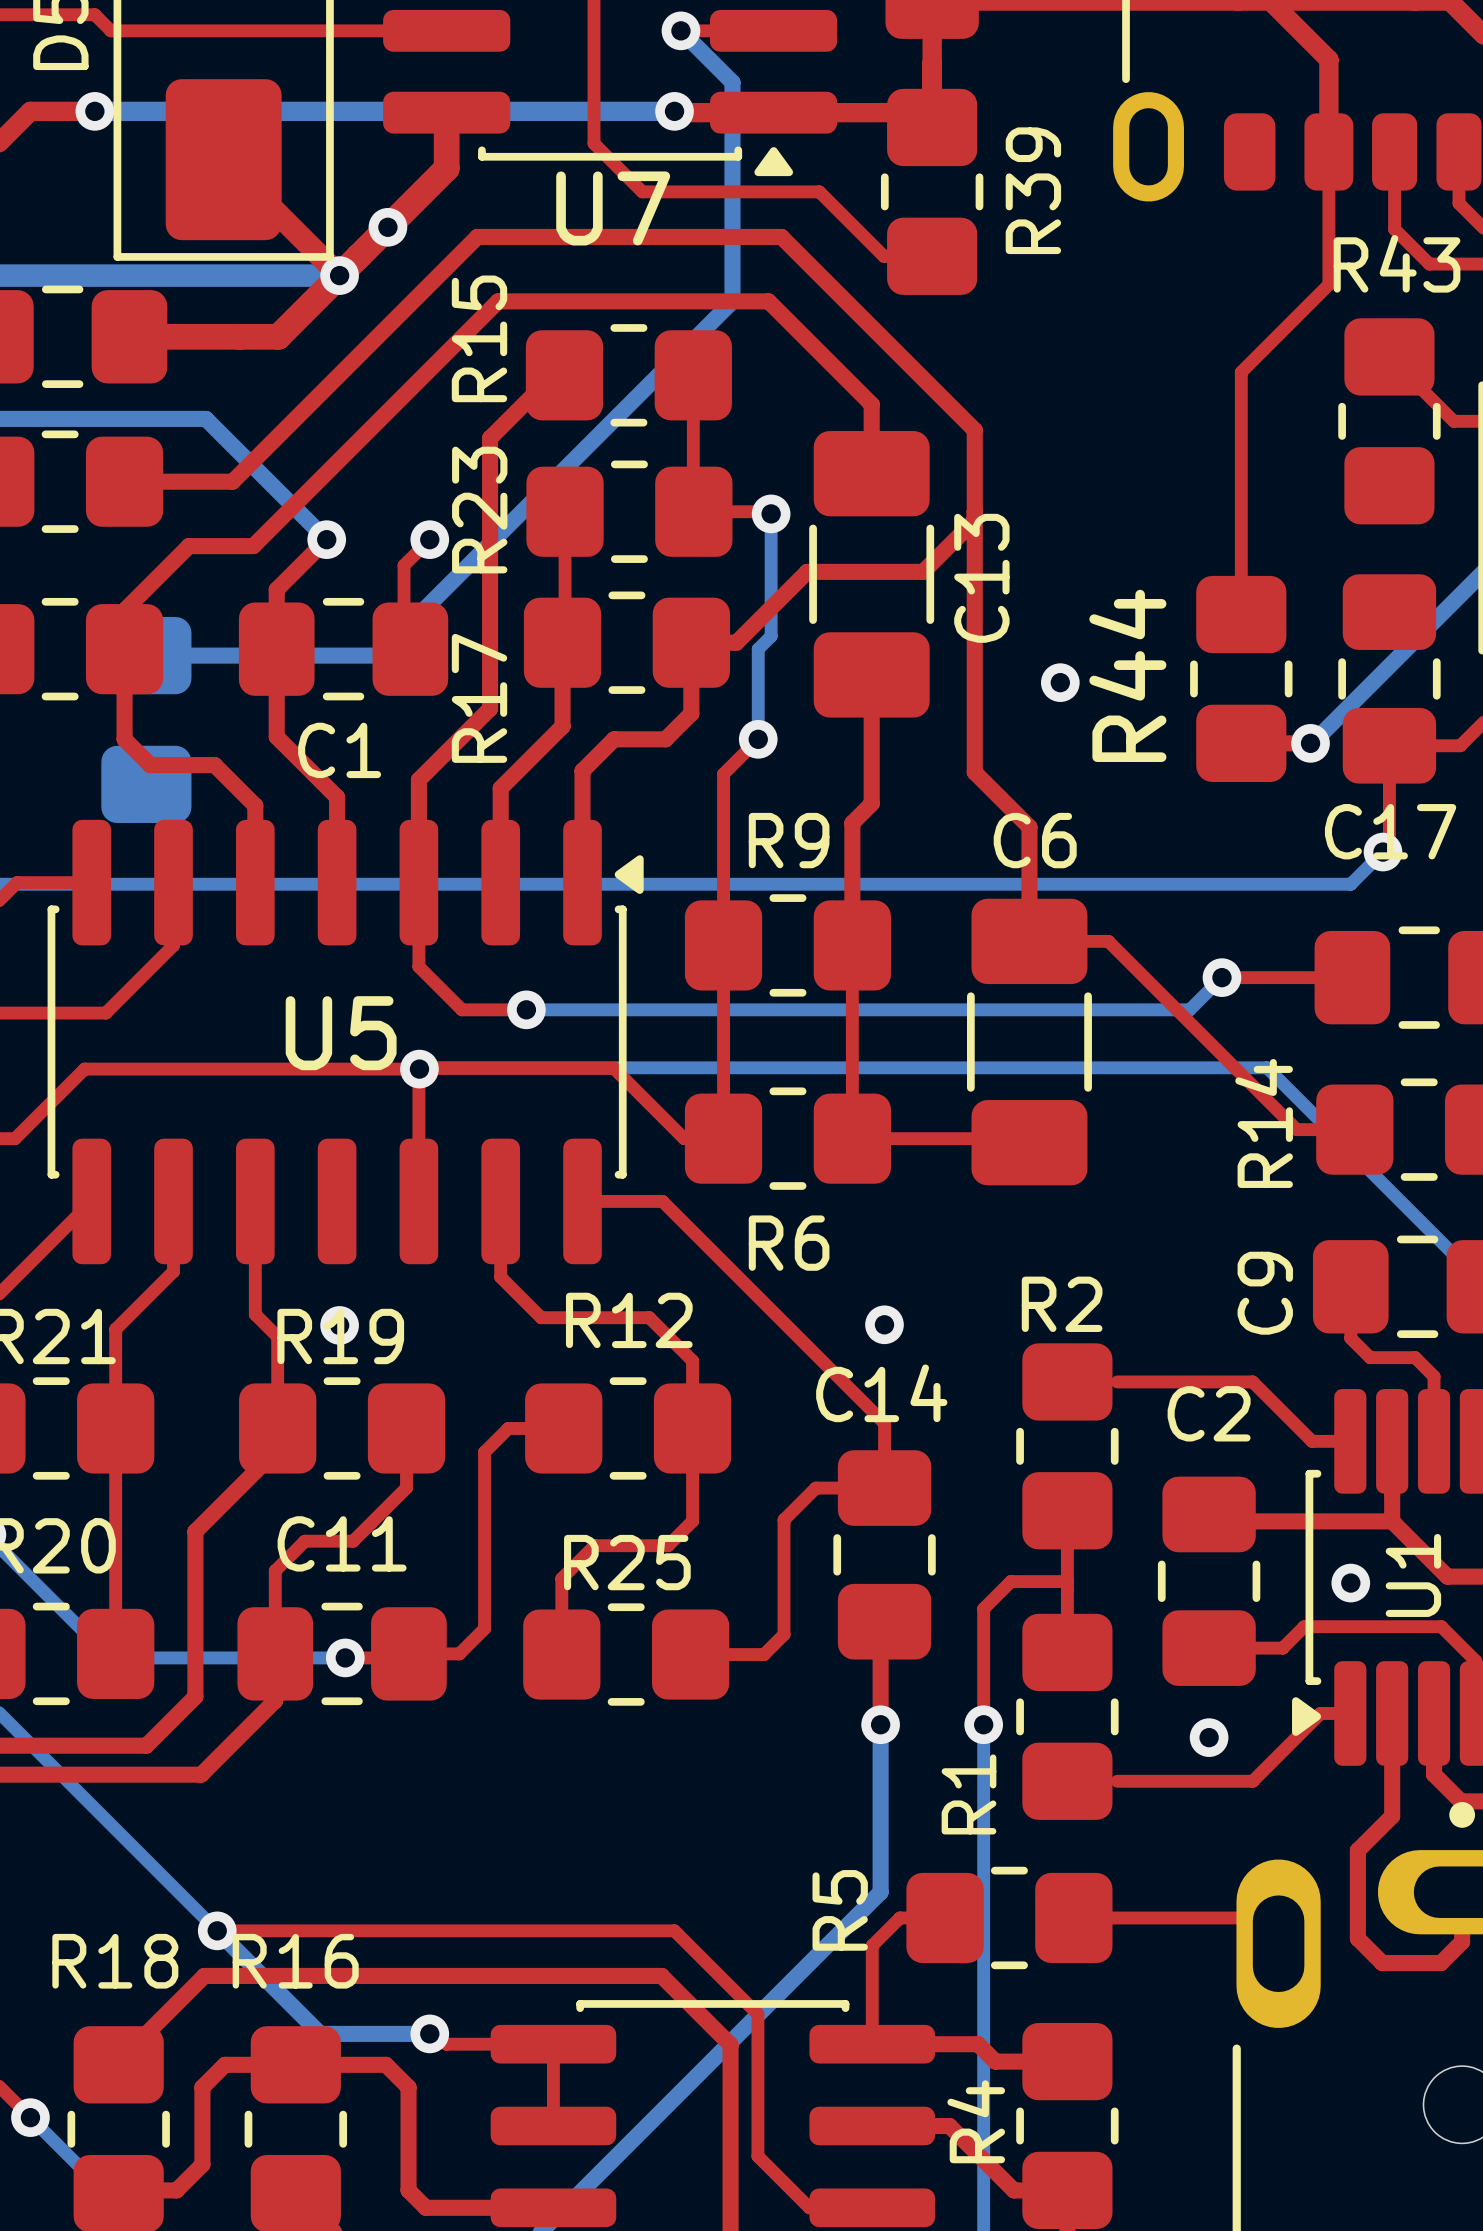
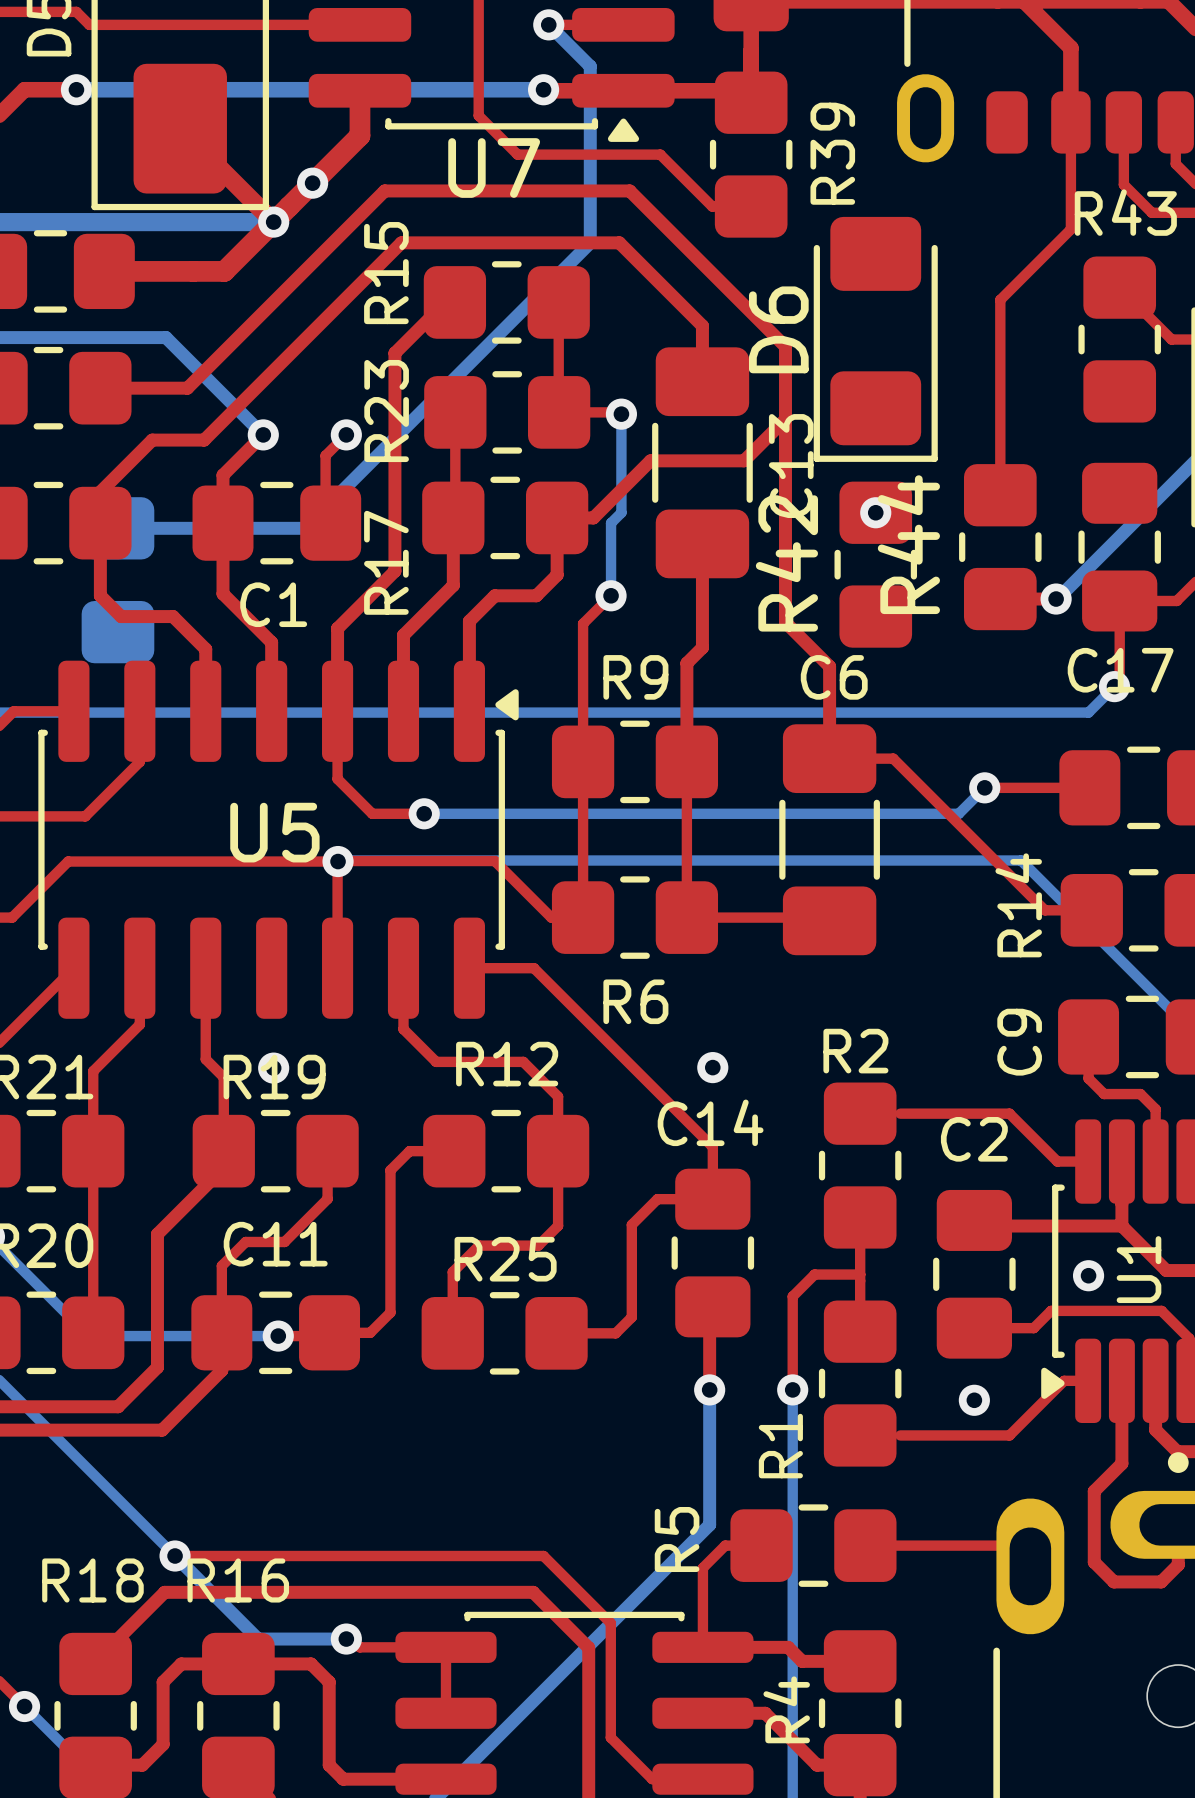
D6: none -> (875, 339)
via position: (1060, 682) -> (875, 512)
R42: none -> (875, 564)

